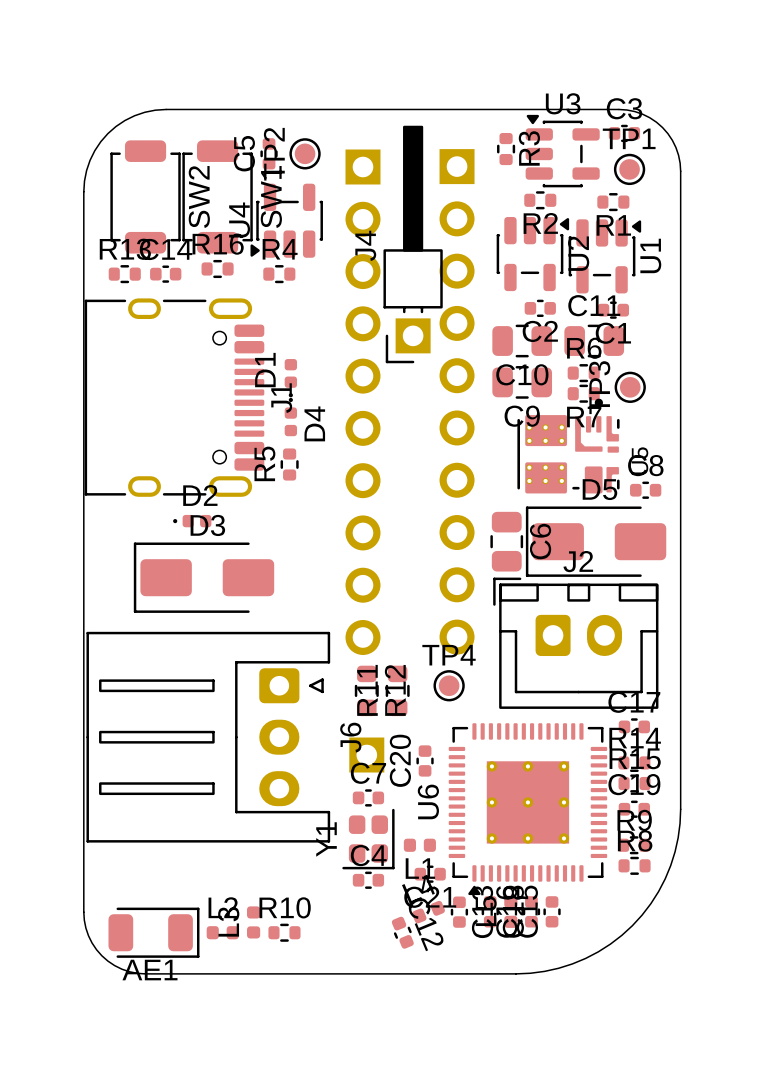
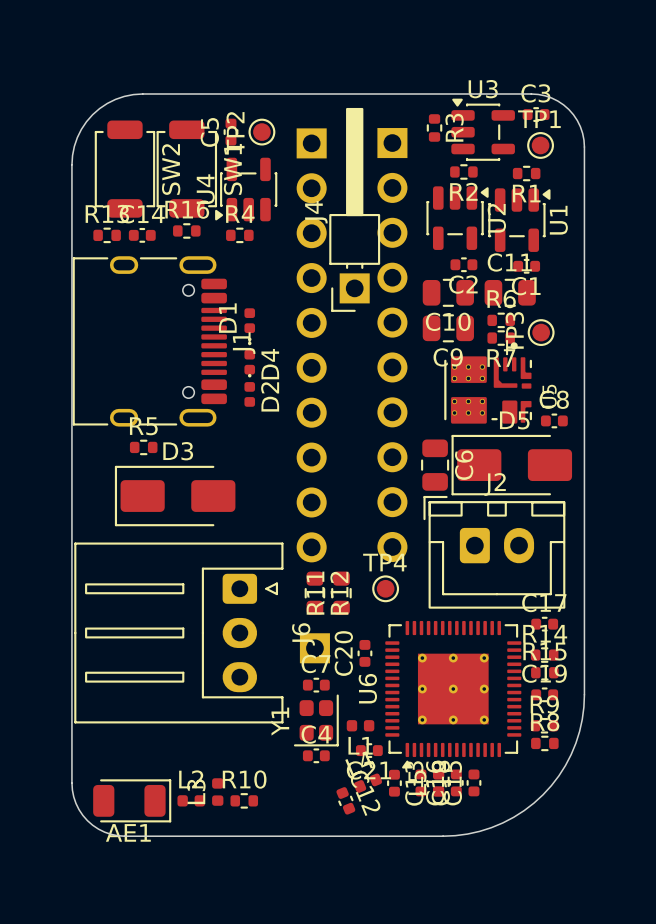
R5 rotation: 0° (289, 464) -> 90° clockwise (143, 447)
R5 position: (289, 464) -> (143, 447)
D2 rotation: 0° (192, 521) -> 90° clockwise (249, 390)
D2 position: (192, 521) -> (249, 390)

